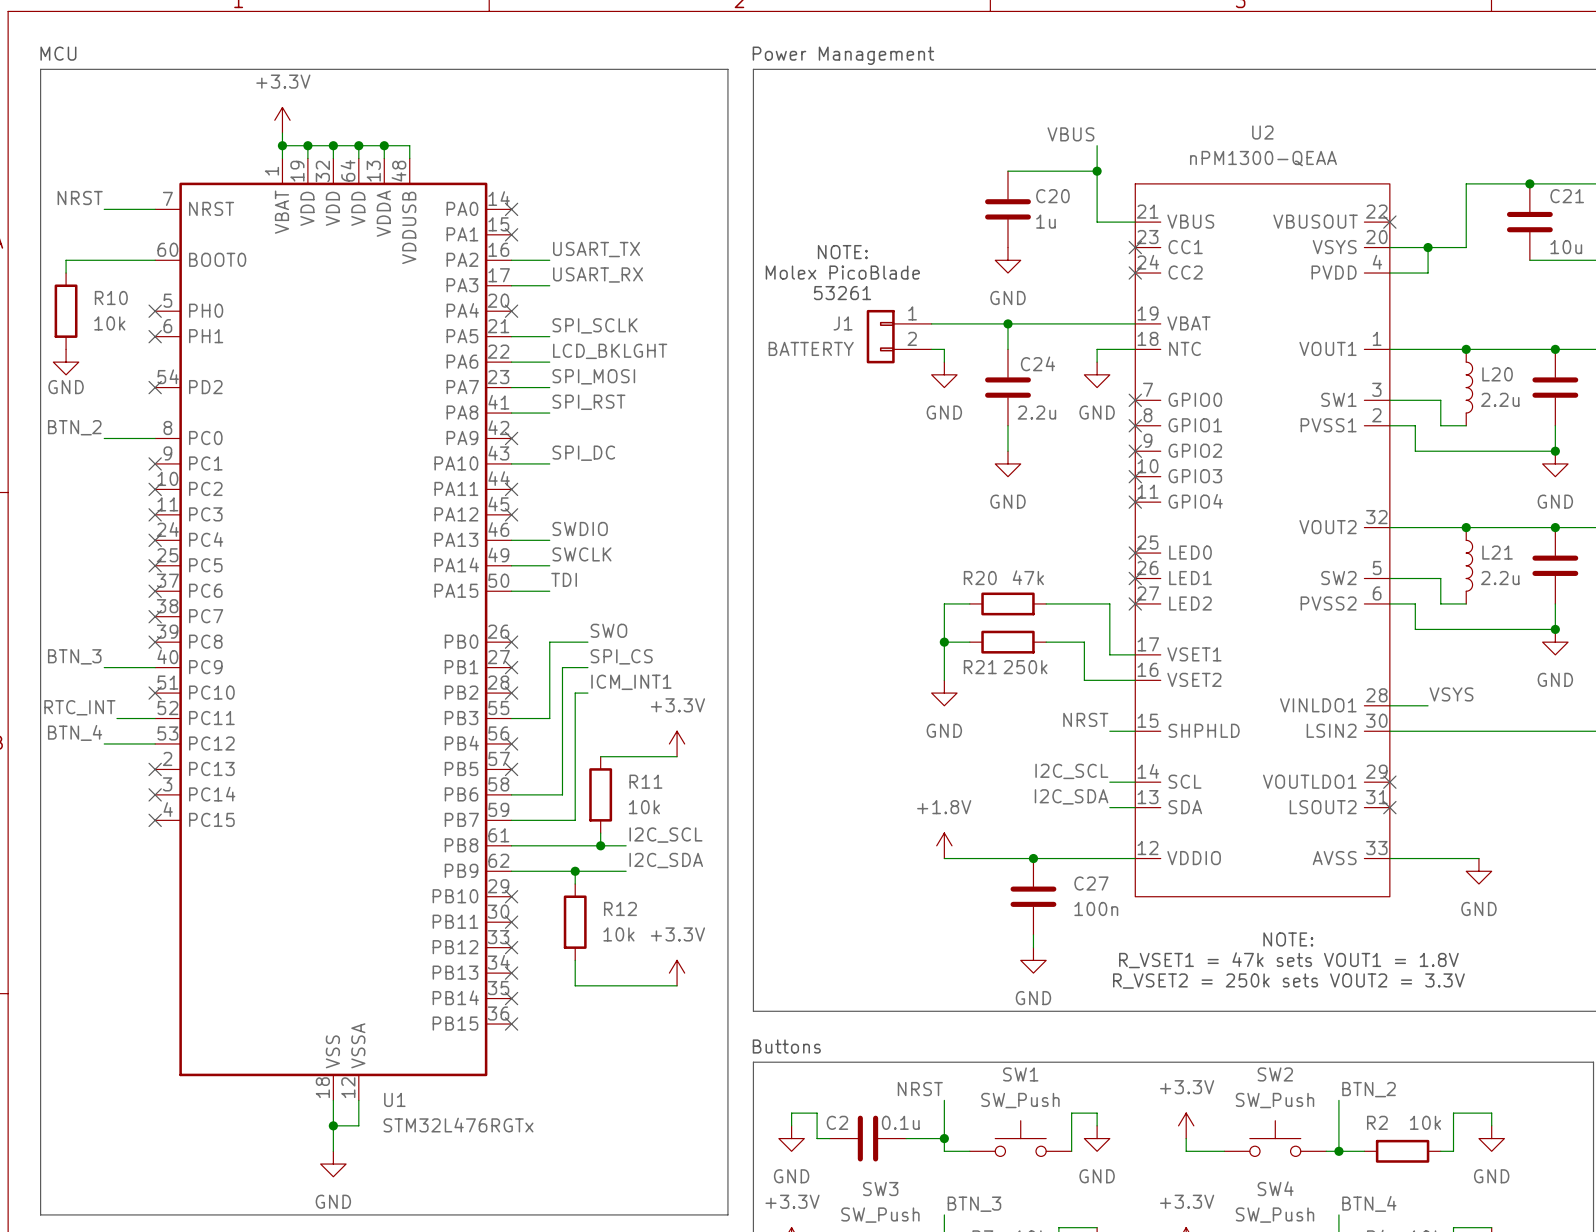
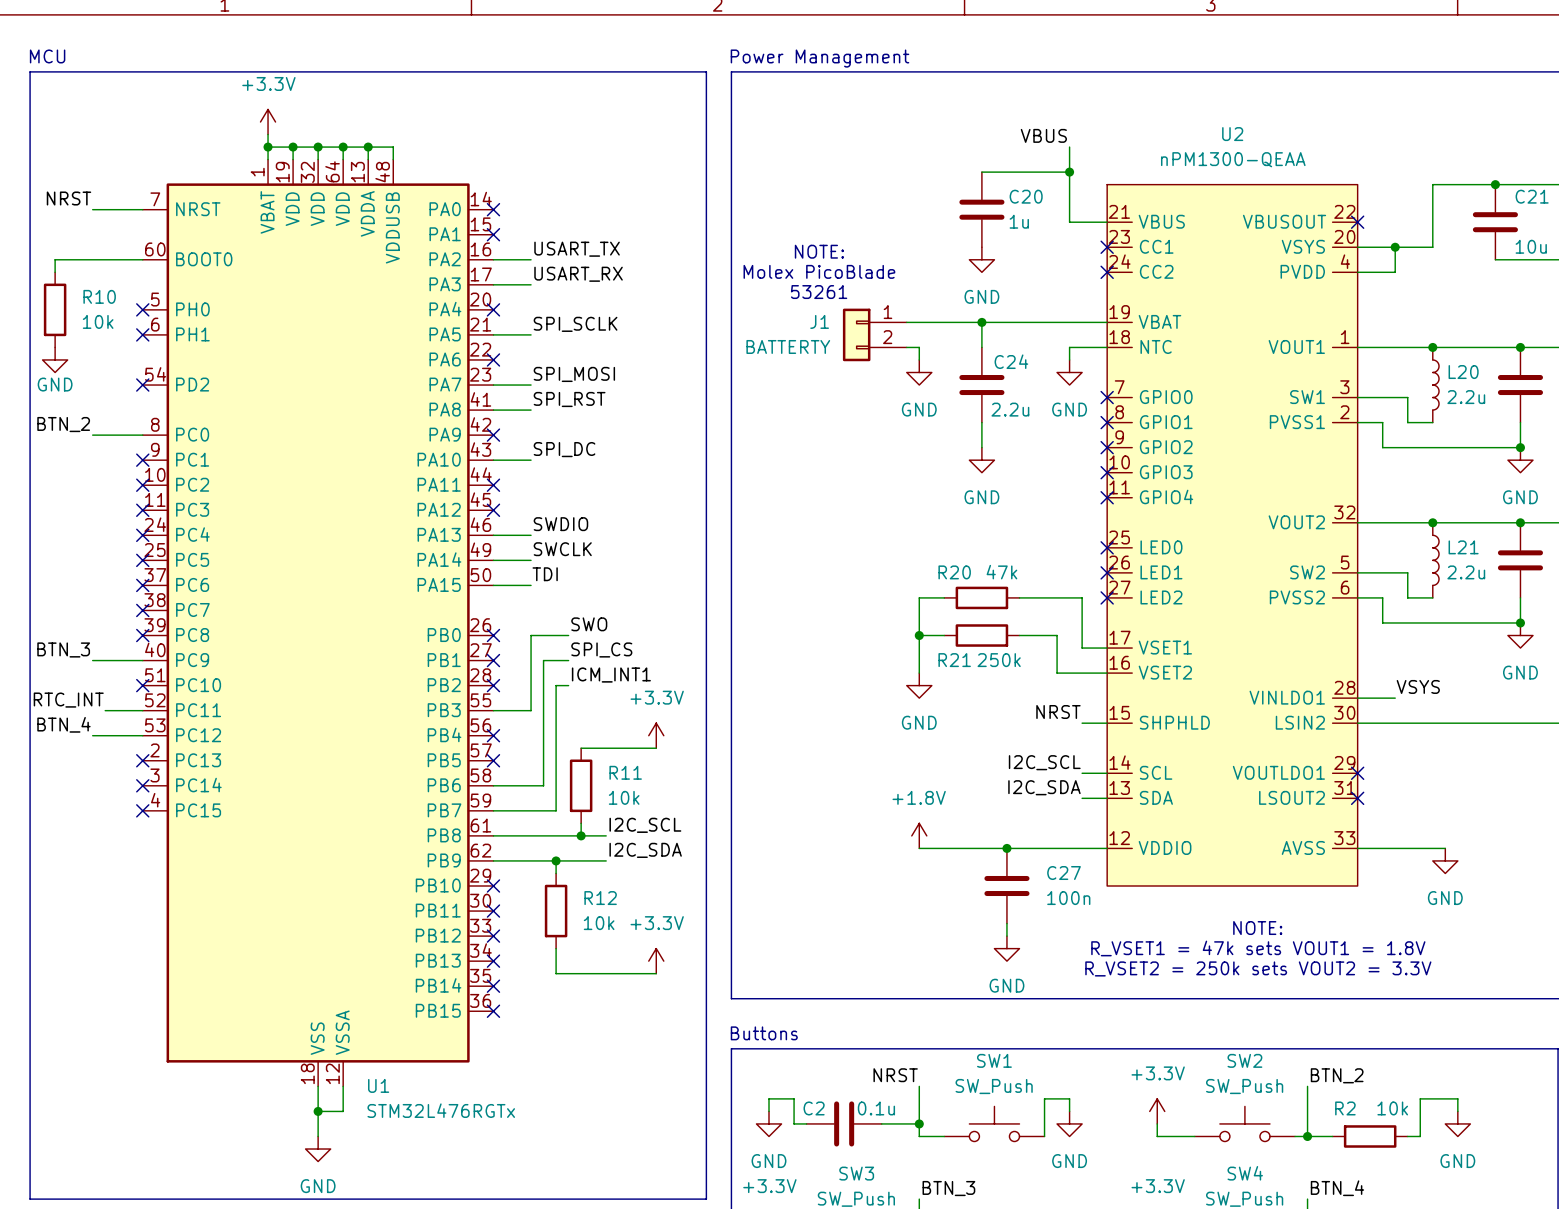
label: LCD_BKLGHT (610, 351) -> none
wire: (511, 362) (549, 362) -> none
no-connect mark: none -> (493, 359)

